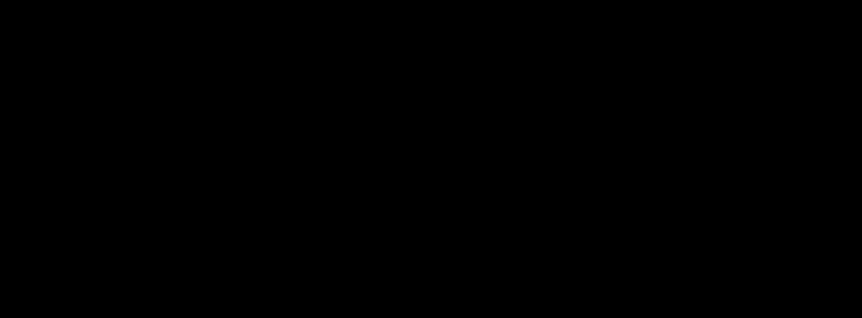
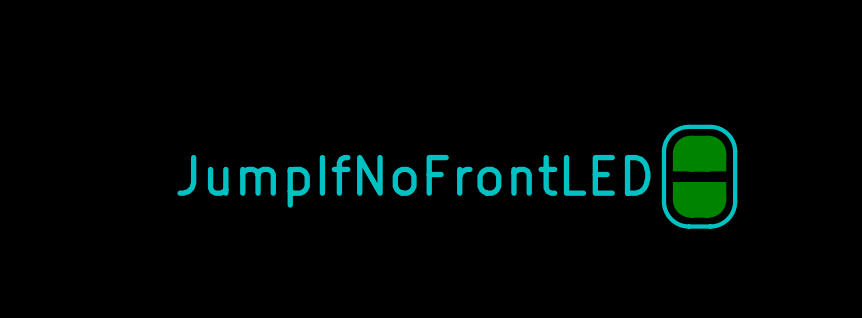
JumpIfNoFrontLED: none -> (699, 176)

